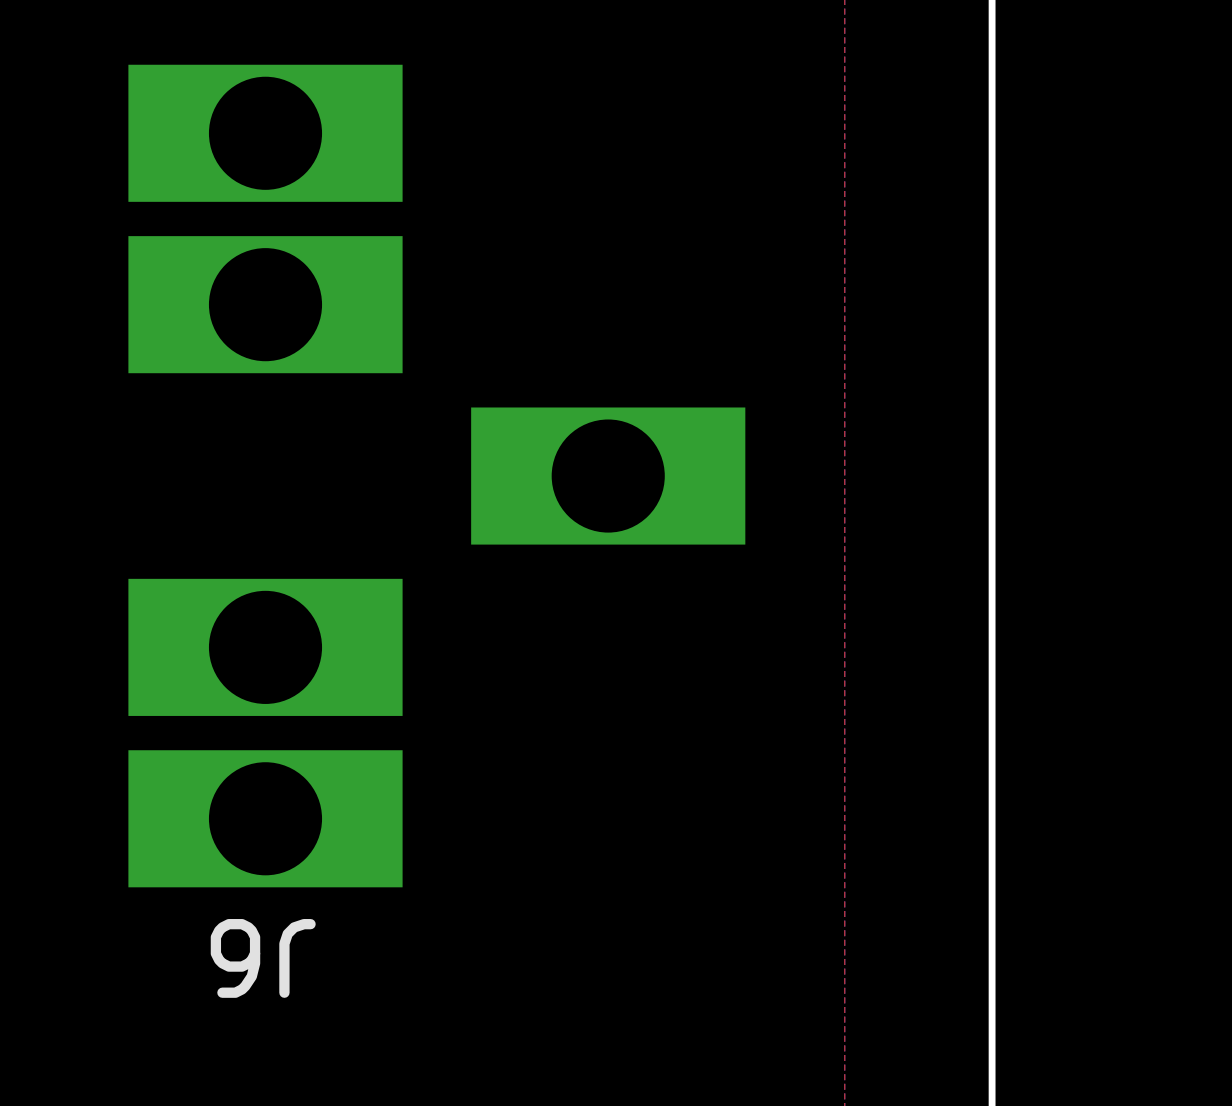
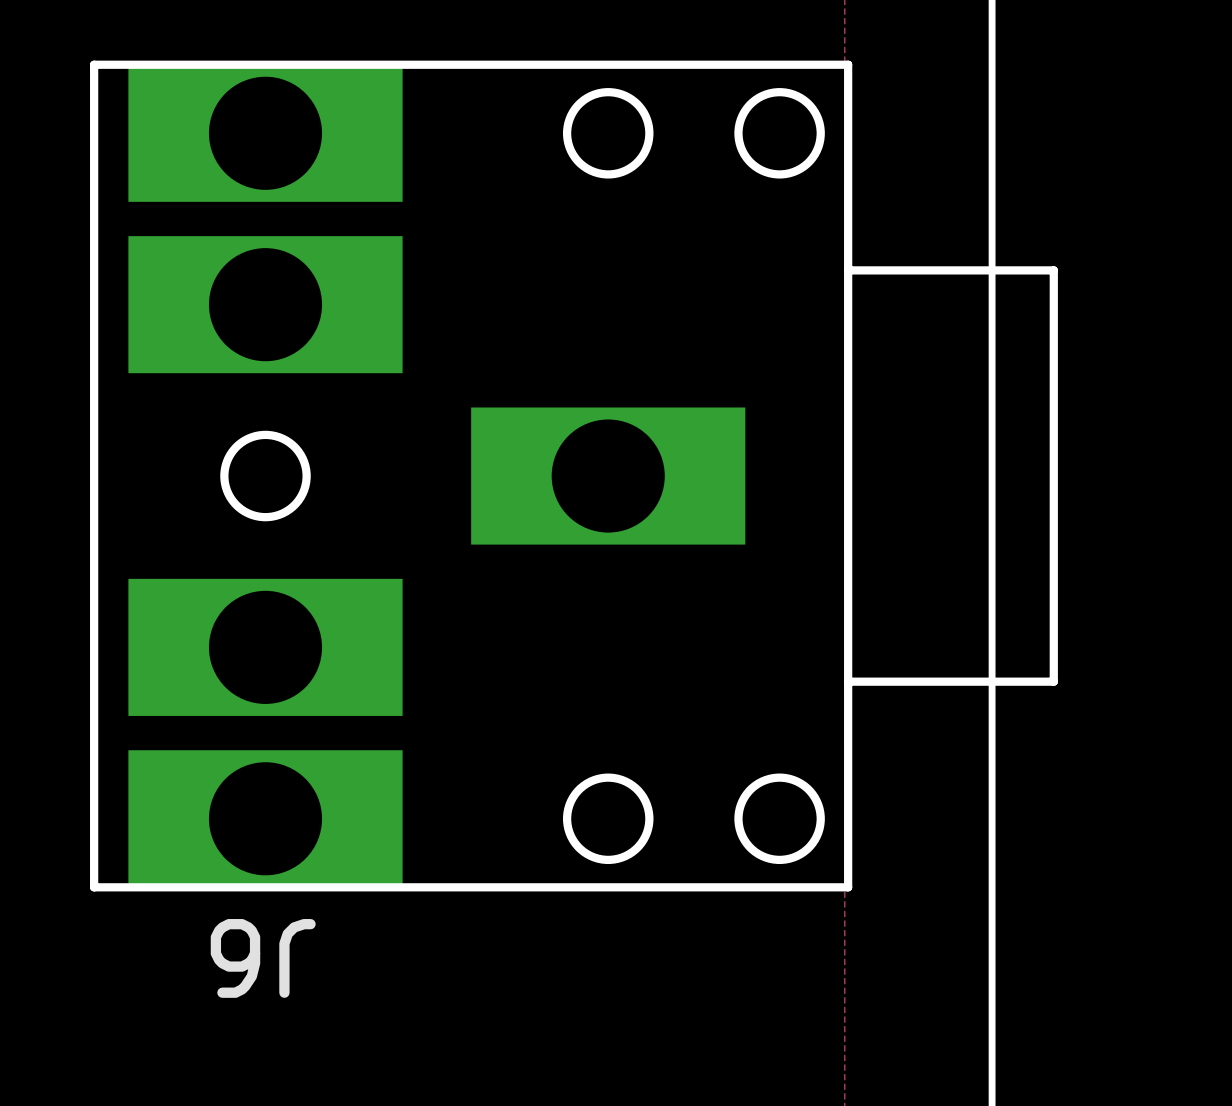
J6 footprint: [128, 64, 746, 888] -> [90, 60, 1058, 892]

